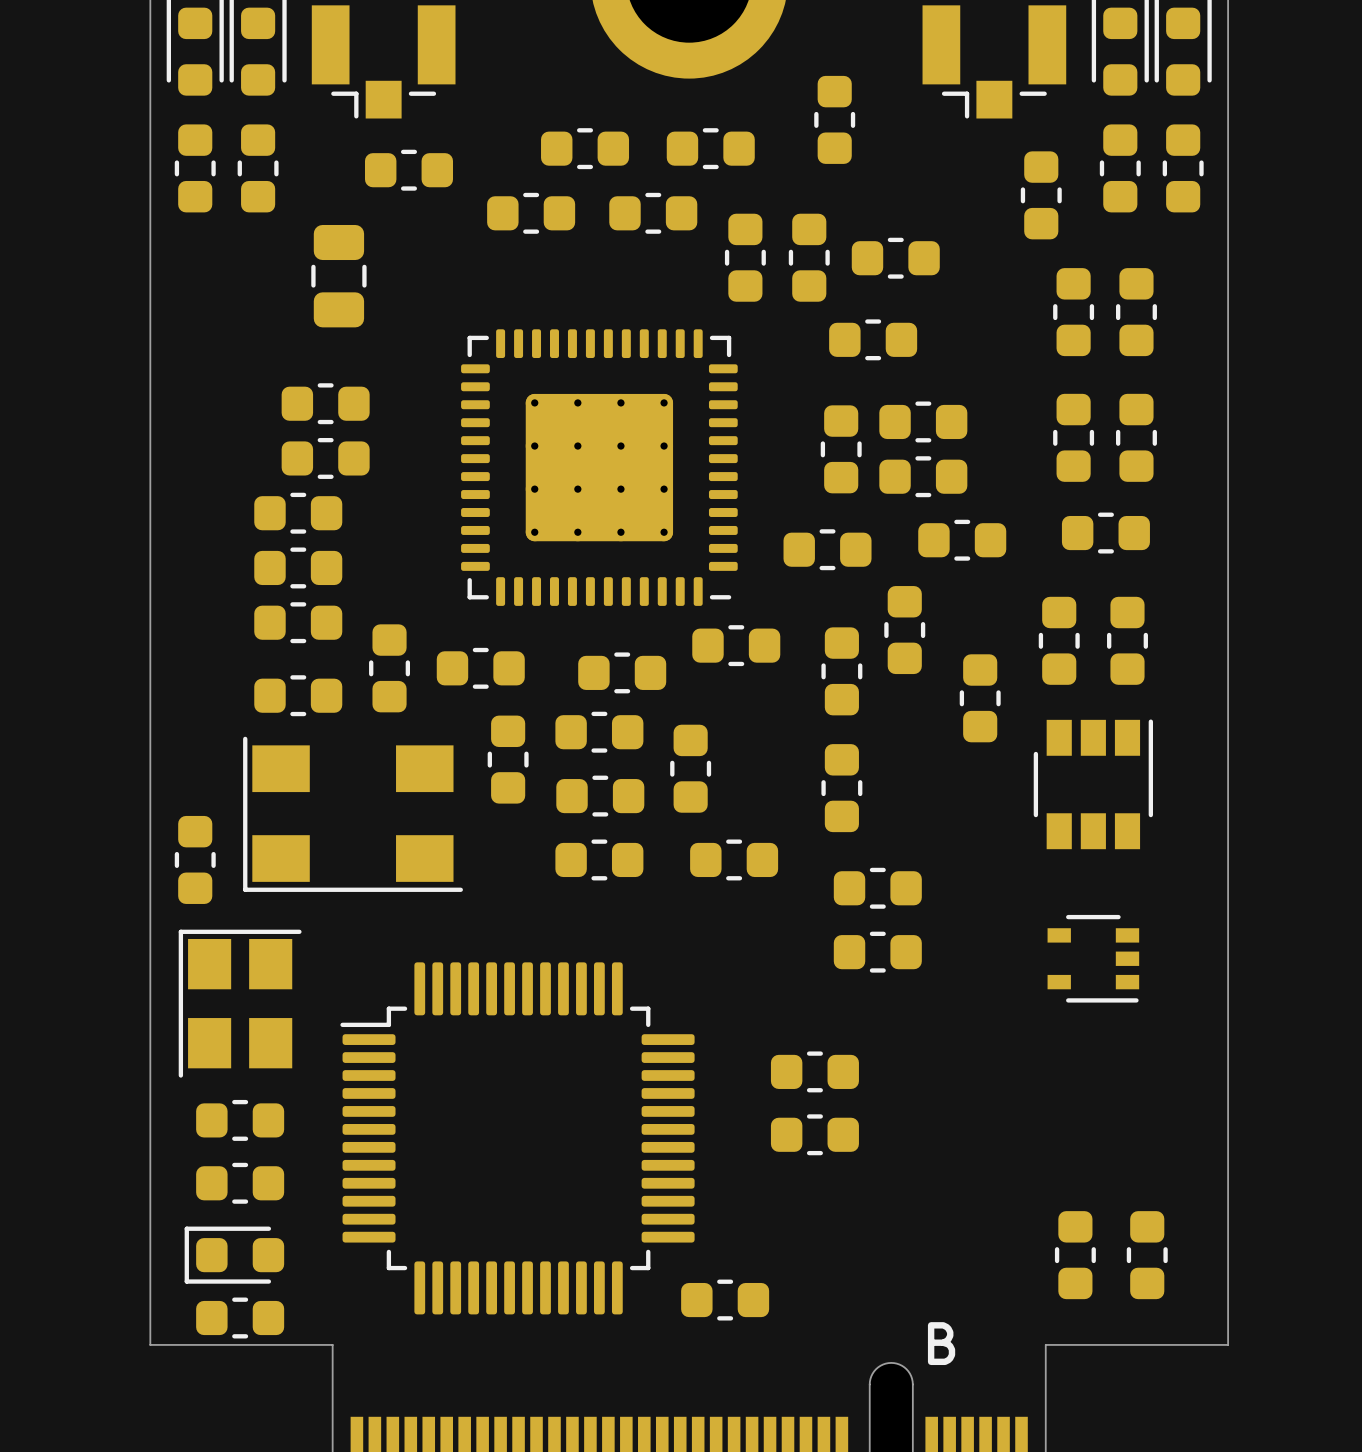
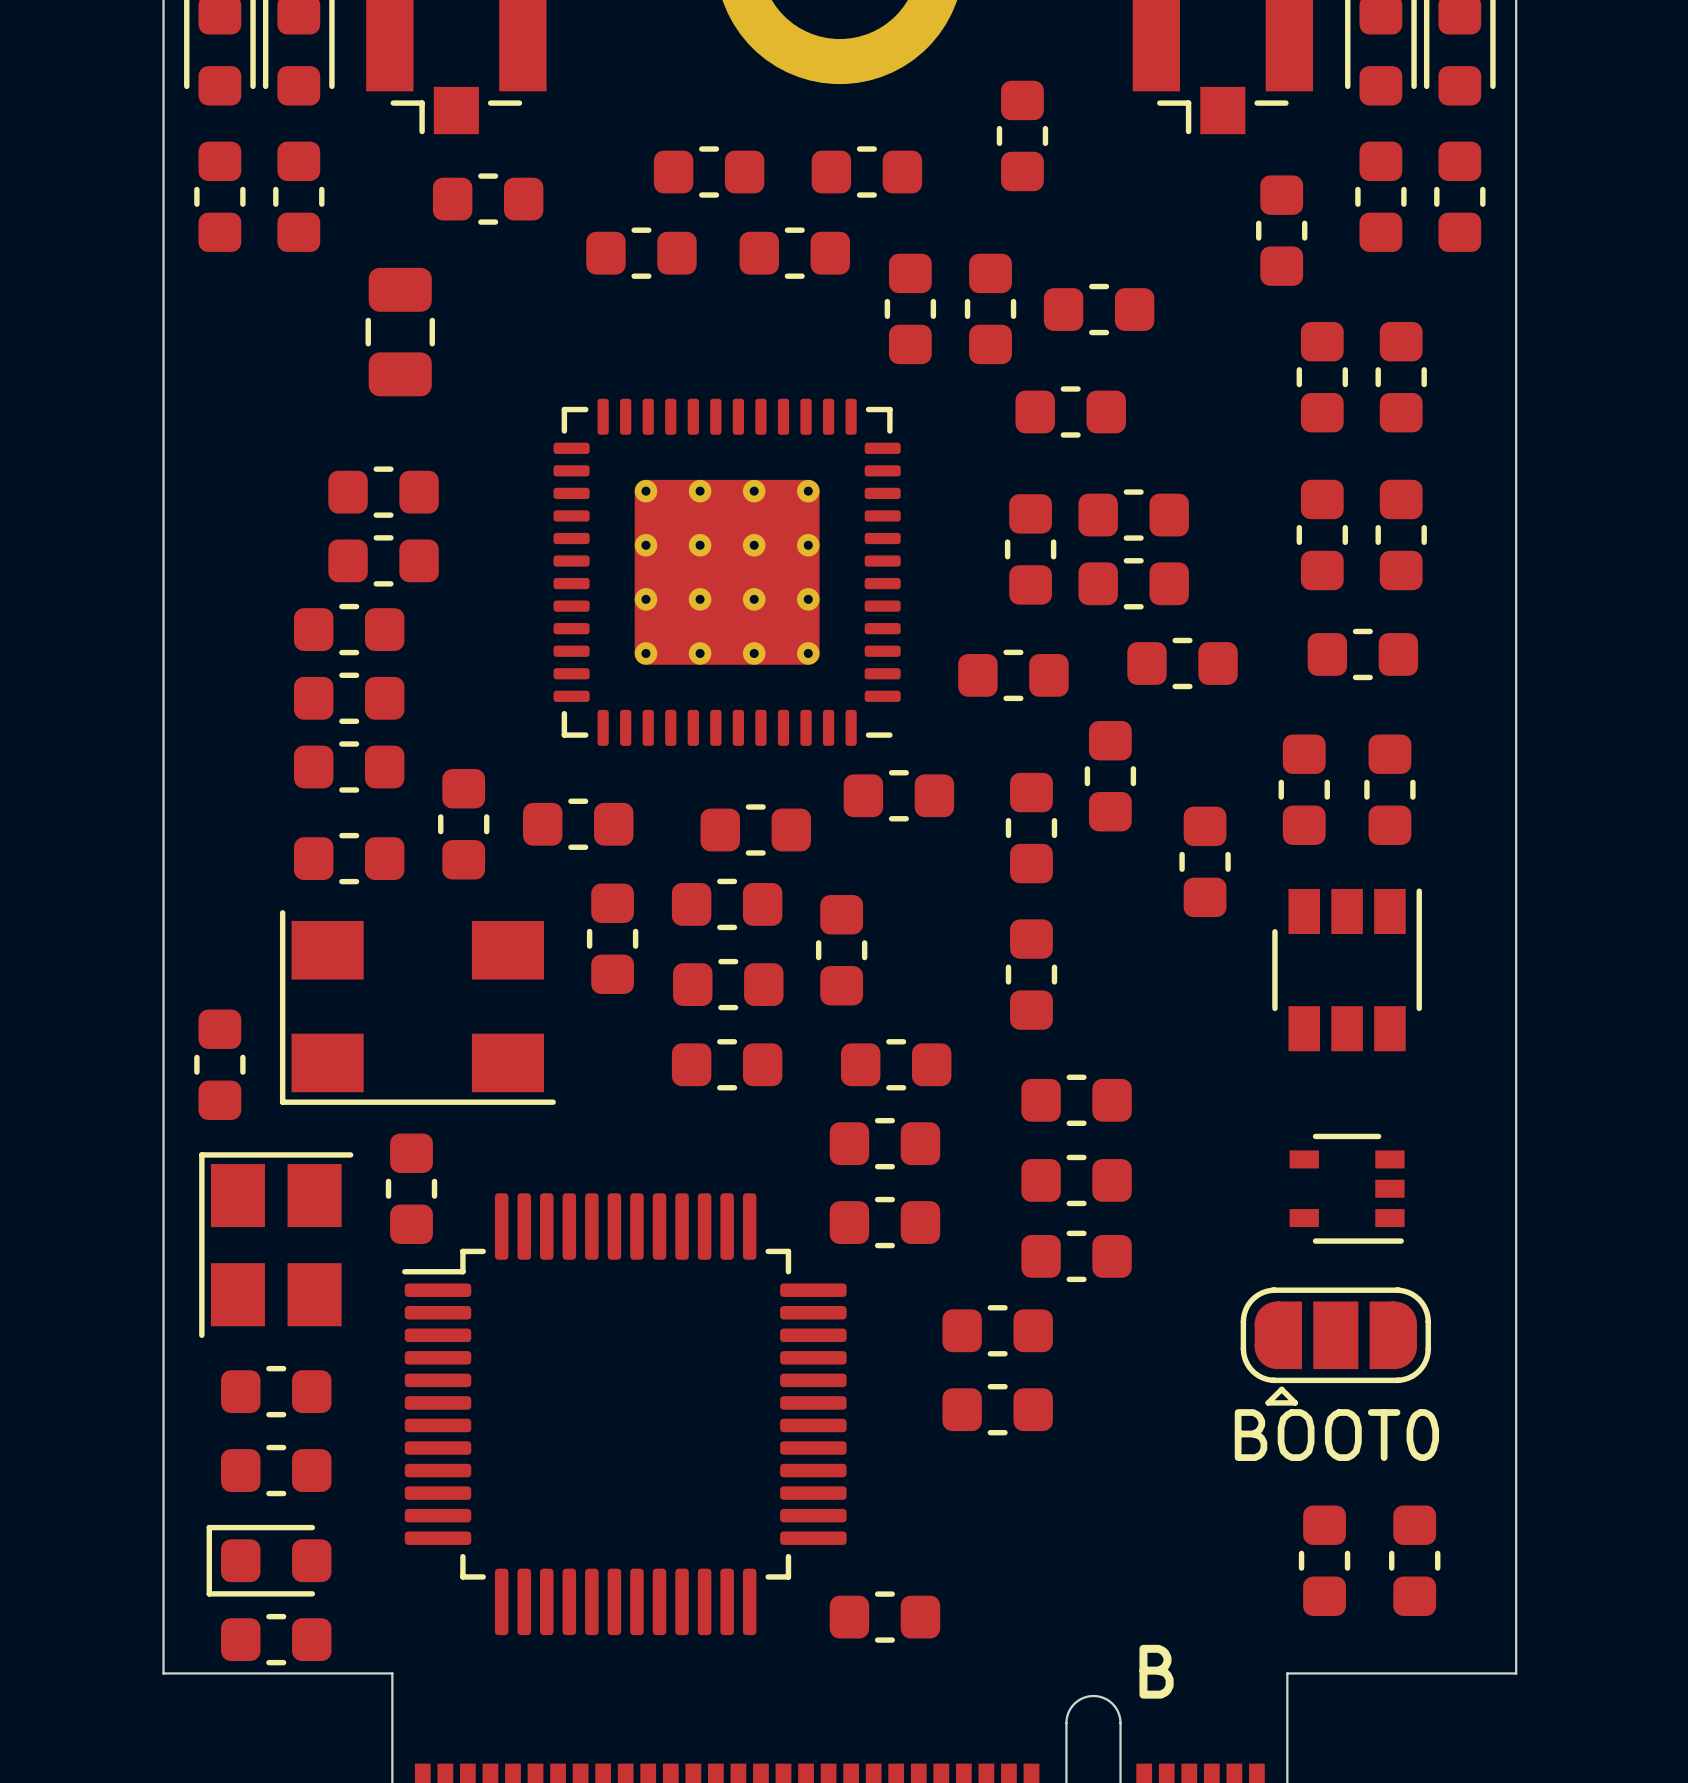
part: none -> (884, 1143)
part: none -> (411, 1188)
part: none -> (884, 1222)
part: none -> (1076, 1256)
part: none -> BOOT0 (1335, 1346)

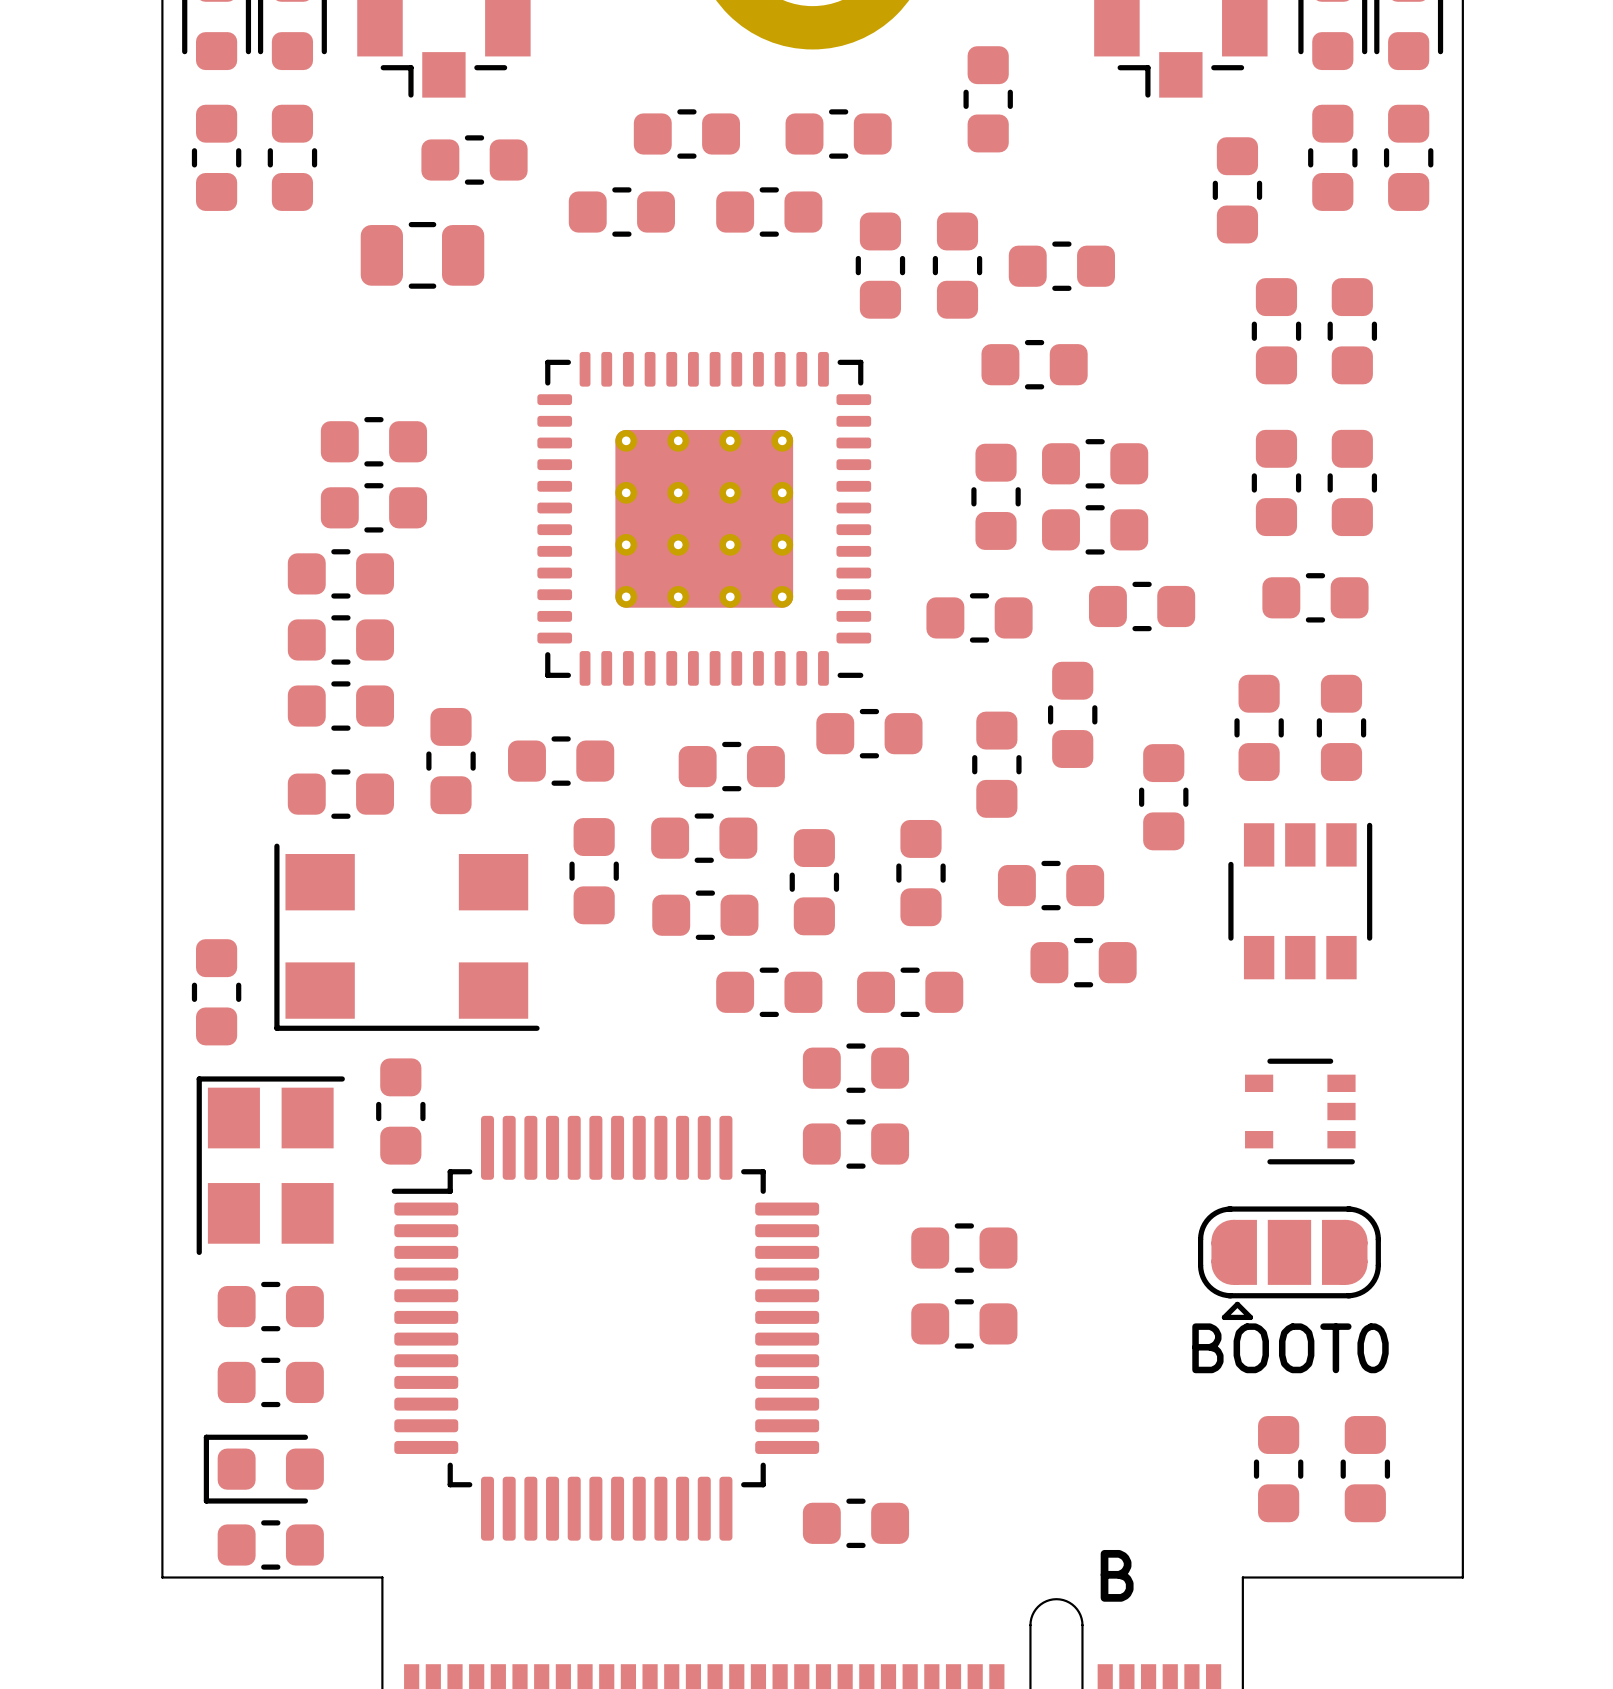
part rotation: 0° (400, 332) -> 90° clockwise (422, 255)
part: none -> (921, 873)
part: none -> (1051, 885)
part: (1031, 974) -> none
part: none -> (1083, 962)
part position: (727, 1064) -> (769, 992)
part position: (896, 1064) -> (910, 992)
part: (1076, 1100) -> none
part: (1076, 1180) -> none
part: (1076, 1256) -> none

